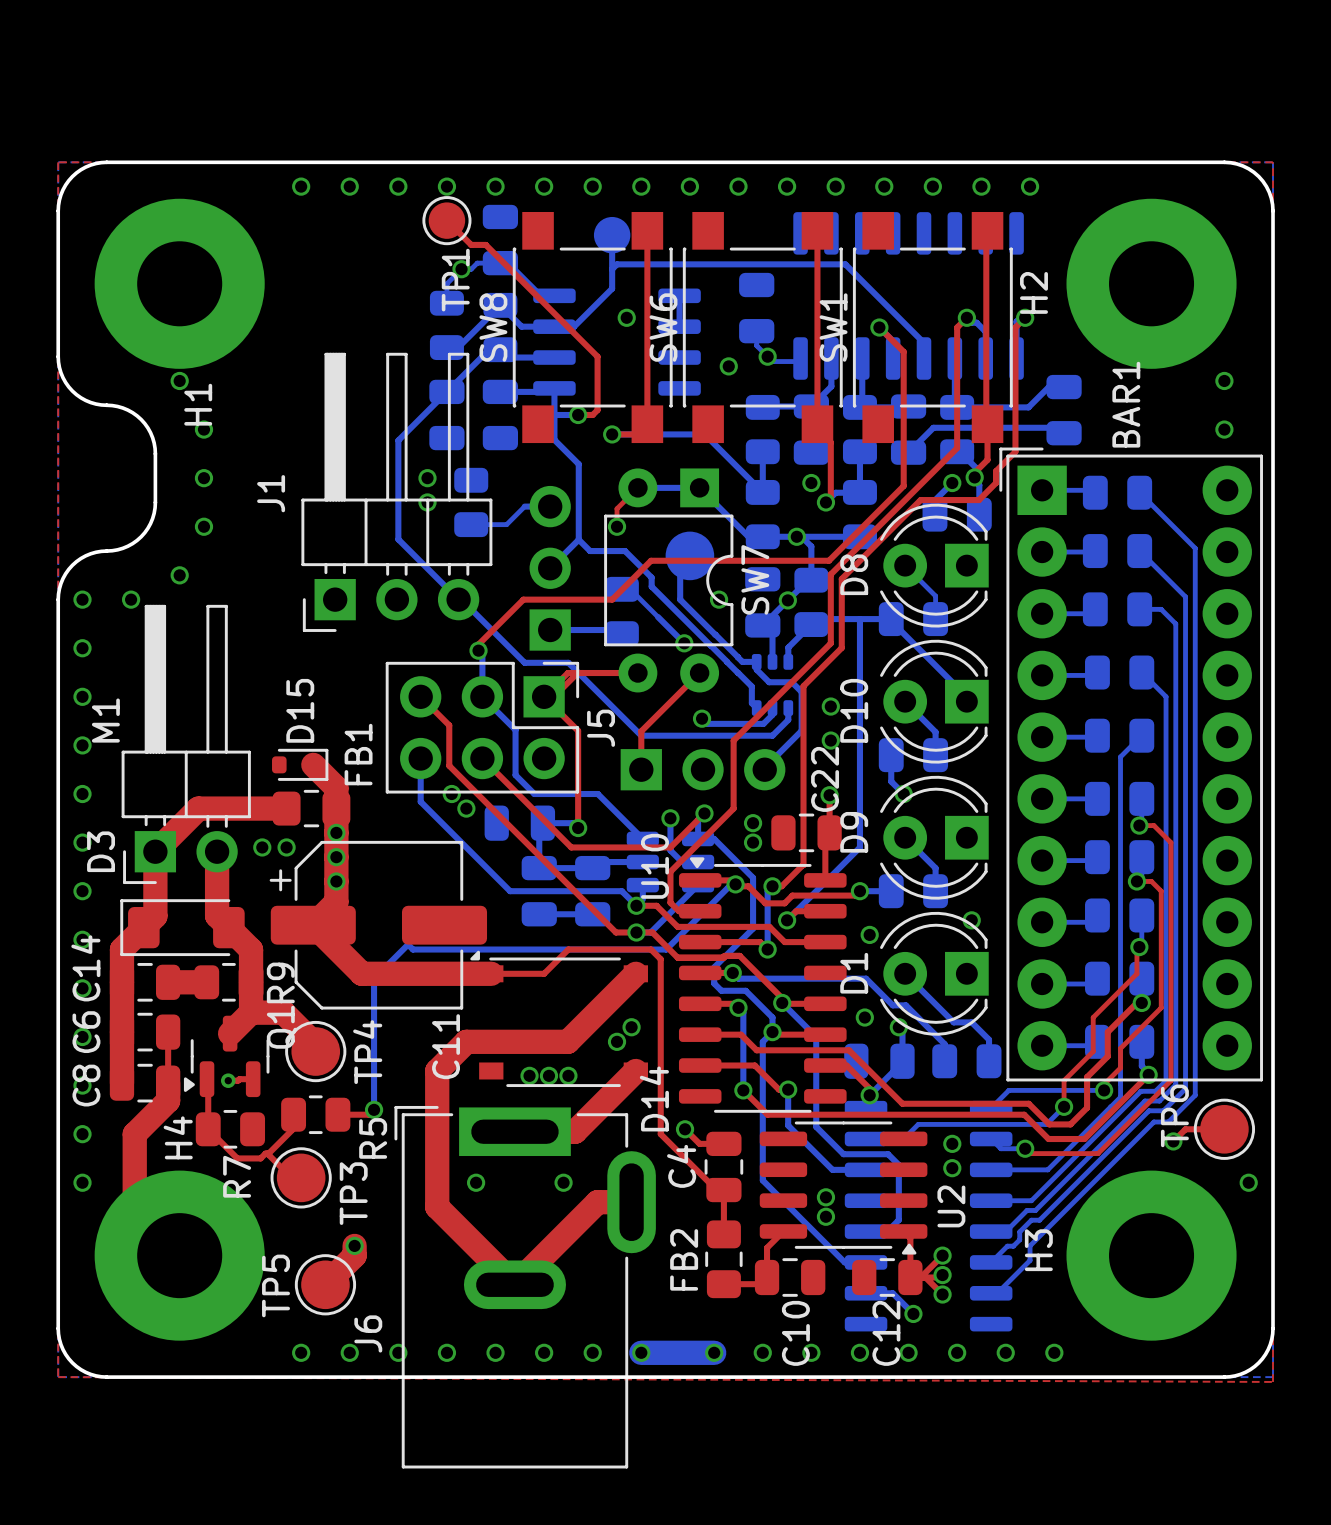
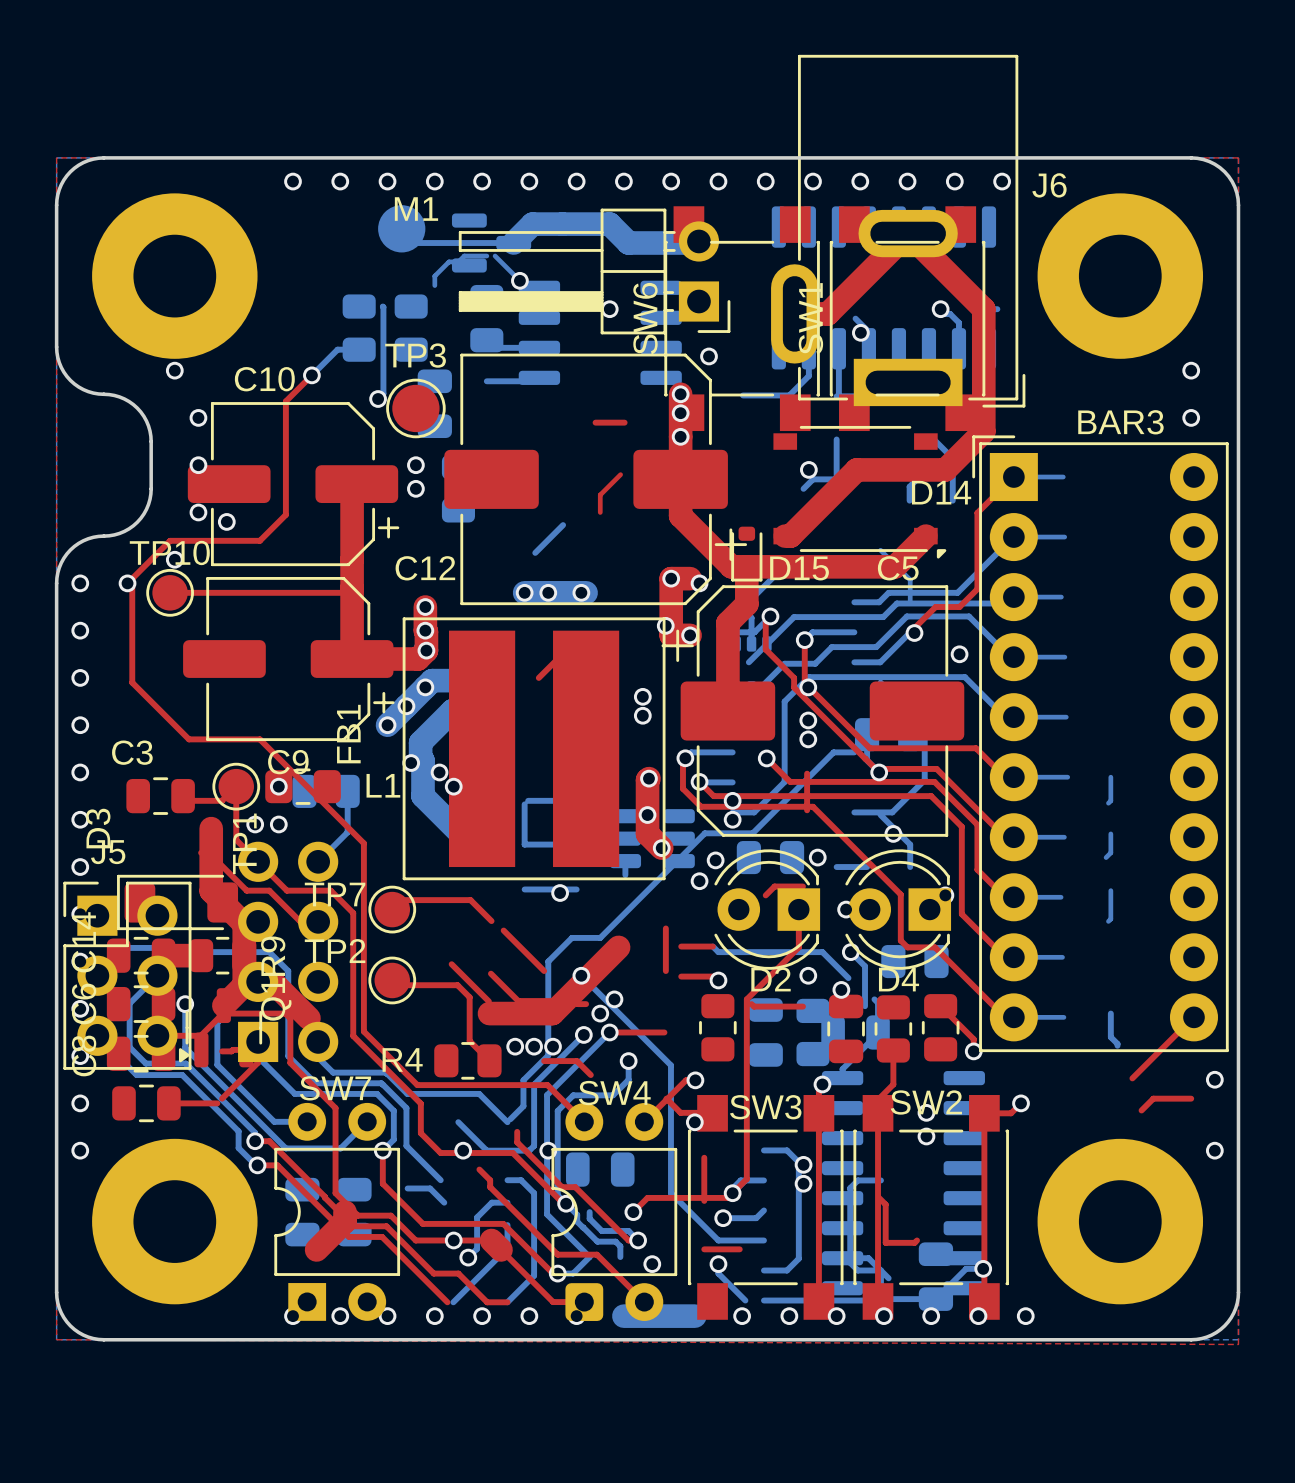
part footprint: [482, 204, 519, 276] -> [451, 213, 532, 273]
top track: (446, 220) (471, 244) (485, 244) (597, 356) (597, 410) (592, 414) (578, 414) -> none
TP1 position: (446, 220) -> (236, 786)
top track: (647, 230) (647, 424) -> none
top track: (817, 230) (817, 429) (830, 442) (830, 497) (825, 502) -> none
bottom track: (612, 235) (612, 288) (574, 326) (521, 326) (500, 305) (458, 347) -> none
part: (612, 235) -> none
top track: (986, 236) (986, 427) -> none
bottom track: none -> (415, 243) (513, 243) (532, 224) (609, 224) (628, 243) (697, 243)
via: (461, 269) -> none
bottom track: (612, 269) (617, 264) (845, 264) (923, 342) -> none
via: none -> (519, 280)
H2 name: H2 (1033, 292) -> none
bottom track: (679, 295) (679, 326) -> none
part: (756, 308) -> none
bottom track: none -> (382, 306) (383, 393) (378, 399)
top track: (966, 317) (957, 327) (957, 448) (830, 574) (830, 643) (733, 740) (733, 808) (670, 871) (670, 902) (678, 911) (700, 911) -> none
top track: (1025, 317) (1015, 327) (1015, 451) (996, 471) (996, 483) (979, 500) (920, 500) (841, 578) (841, 647) (803, 686) (803, 865) (781, 886) (772, 886) -> none
via: (1025, 317) -> none
top track: none -> (794, 313) (827, 313) (908, 233) (983, 309) (983, 431) (945, 469) (856, 469) (790, 536) (785, 536)
part position: (446, 325) -> (411, 328)
SW8: (592, 327) -> none
top track: (879, 327) (903, 351) (903, 486) (828, 560) (651, 560) (612, 599) (523, 599) (478, 644) (478, 650) -> none
via position: (879, 327) -> (860, 332)
bottom track: (756, 331) (756, 345) (772, 361) (797, 361) -> none
part: none -> (359, 328)
bottom track: (489, 349) (398, 440) (398, 539) (458, 599) -> none
via: (767, 356) -> none
bottom track: none -> (359, 349) (337, 349) (311, 375)
top track: none -> (311, 375) (285, 401) (285, 514) (259, 540) (170, 540) (132, 578) (132, 682) (188, 739) (259, 739) (363, 843) (363, 1031) (417, 1085) (547, 1085) (584, 1121)
via: none -> (311, 375)
bottom track: (1064, 387) (1048, 387) (1028, 407) (957, 407) -> none
bottom track: (554, 388) (554, 439) (578, 464) (578, 539) (590, 551) (625, 551) (651, 577) (651, 586) (710, 645) -> none
H1 name: H1 (198, 404) -> none
BAR1 name: BAR1 (1126, 404) -> BAR3 (1120, 422)
top track: none -> (680, 394) (680, 515) (731, 566) (895, 566) (925, 536)
via: none -> (680, 394)
via: none -> (378, 399)
part: (1064, 410) -> none
C3 side: bottom (500, 414) -> top (160, 796)
bottom track: (554, 414) (578, 414) -> none
via: (578, 414) -> none
via: none -> (680, 413)
top track: (987, 424) (987, 459) (974, 472) (974, 477) -> none
bottom track: (1058, 427) (933, 427) (908, 452) -> none
part: (762, 429) -> none
part: (811, 429) -> none
part: (859, 429) -> none
part: (908, 429) -> none
part: (957, 429) -> none
bottom track: (612, 434) (704, 434) (762, 492) (762, 451) -> none
via: (612, 434) -> none
via: none -> (680, 436)
via: (974, 477) -> none
via: (811, 483) -> none
via: none -> (808, 469)
via: (952, 483) -> none
bottom track: (637, 487) (699, 487) (748, 536) (859, 536) -> none
J1: (396, 492) -> none
part: (1117, 492) -> none
bottom track: (1139, 492) (1195, 548) (1195, 1095) (1168, 1122) (1153, 1122) (1030, 1245) (1030, 1260) (997, 1293) -> none
top track: none -> (1009, 481) (977, 512) (977, 589) (959, 607) (935, 607) (914, 628) (914, 633)
top track: none -> (352, 488) (352, 659) (418, 659) (426, 650) (425, 607)
via: (825, 502) -> none
bottom track: (550, 506) (524, 506) (506, 524) (471, 524) -> none
part: (762, 514) -> none
part: (859, 514) -> none
part: (957, 514) -> none
via: (617, 526) -> none
via: none -> (226, 521)
via: (796, 536) -> none
bottom track: (801, 536) (811, 546) (811, 580) -> none
part: (1117, 551) -> none
bottom track: (1139, 551) (1185, 596) (1185, 1088) (1163, 1110) (1148, 1110) (1039, 1220) (1031, 1220) (1019, 1231) (1019, 1239) (1013, 1246) (1007, 1246) (991, 1262) -> none
part position: (689, 555) -> (401, 228)
bottom track: none -> (1009, 541) (957, 592) (888, 592) (879, 602) (867, 602)
bottom track: (680, 565) (680, 599) (715, 634) -> none
D8: (934, 565) -> none
part: (550, 568) -> none
SW7 name position: SW7 (755, 579) -> SW7 (335, 1088)
SW7 rotation: 0° (668, 580) -> 180° (337, 1211)
SW7 position: (668, 580) -> (337, 1211)
top track: none -> (746, 566) (746, 604) (727, 623) (727, 711)
bottom track: (630, 589) (684, 643) -> none
via: none -> (671, 578)
top track: none -> (690, 578) (671, 578) (671, 635) (690, 635)
bottom track: (461, 599) (524, 662) (568, 662) (641, 735) (772, 735) (788, 719) (788, 708) -> none
via position: (787, 600) -> (770, 616)
part: (762, 602) -> none
part: (811, 602) -> none
top track: none -> (352, 588) (347, 592) (170, 592)
TP10: none -> (170, 592)
bottom track: none -> (524, 592) (586, 592)
via: none -> (524, 592)
via: none -> (548, 592)
via: none -> (581, 592)
part: (1117, 609) -> none
bottom track: (1139, 609) (1161, 609) (1175, 623) (1175, 1084) (1159, 1101) (1144, 1101) (1035, 1210) (1027, 1210) (1005, 1231) (991, 1231) -> none
part: (621, 611) -> none
bottom track: (821, 619) (878, 619) -> none
bottom track: (859, 619) (859, 847) (787, 920) -> none
part: (913, 619) -> none
bottom track: none -> (1006, 603) (896, 603) (883, 617) (794, 617) (748, 662)
bottom track: (891, 621) (966, 696) -> none
via: none -> (425, 607)
bottom track: (811, 624) (788, 647) (788, 661) -> none
bottom track: (550, 630) (603, 630) -> none
top track: none -> (770, 616) (765, 621) (765, 649) (794, 677) (794, 687) (865, 758)
bottom track: none -> (770, 616) (754, 632) (732, 632)
bottom track: (715, 634) (737, 657) -> none
bottom track: (710, 645) (726, 661) -> none
via: none -> (425, 630)
bottom track: none -> (854, 632) (812, 632) (804, 640)
bottom track: (478, 650) (482, 654) (482, 696) (515, 729) (515, 775) (534, 794) (597, 794) (642, 838) -> none
via: (478, 650) -> none
bottom track: none -> (914, 633) (909, 633) (880, 662) (854, 662)
via: none -> (914, 633)
via: none -> (690, 635)
bottom track: (737, 657) (742, 661) (756, 661) (756, 669) (769, 682) (791, 682) (801, 691) (801, 730) (764, 767) -> none
top track: none -> (804, 640) (804, 683) (869, 748) (976, 748) (1009, 781)
via: none -> (804, 640)
bottom track: (726, 661) (737, 672) -> none
via: none -> (426, 650)
bottom track: (738, 672) (751, 686) (751, 703) (756, 708) -> none
via: none -> (959, 654)
part: (1119, 672) -> none
bottom track: (1141, 672) (1166, 696) (1166, 1080) (1155, 1091) (1140, 1091) (1031, 1200) (991, 1200) -> none
top track: (637, 673) (567, 673) (544, 696) (578, 730) (578, 828) -> none
top track: (699, 673) (641, 731) (641, 769) -> none
bottom track: none -> (1009, 656) (969, 616) (906, 616) (876, 647) (831, 647) (815, 663) (784, 663) (756, 692) (732, 692)
C9: none -> (288, 659)
top track: (420, 696) (449, 725) (449, 765) (615, 932) (652, 932) (677, 957) (723, 957) (725, 955) -> none
bottom track: none -> (472, 680) (432, 680) (387, 725)
D10: (934, 701) -> none
via: none -> (425, 687)
bottom track: (772, 708) (772, 714) (763, 723) (707, 723) (699, 716) -> none
via: none -> (642, 696)
via: (702, 718) -> none
M1 name position: M1 (105, 720) -> M1 (416, 209)
via: none -> (406, 706)
bottom track: none -> (948, 706) (924, 730) (924, 780) (892, 812) (854, 812)
J5 rotation: 0° (482, 727) -> 90° counterclockwise (127, 975)
J5 position: (482, 727) -> (127, 975)
bottom track: none -> (472, 710) (452, 710) (420, 742) (420, 758) (423, 760) (423, 796) (458, 831)
C5: none -> (812, 711)
via: none -> (642, 715)
part: (1119, 735) -> none
bottom track: (1141, 735) (1120, 756) (1120, 1097) (1047, 1169) (991, 1169) -> none
bottom track: none -> (1009, 721) (964, 677) (809, 677) (784, 701) (784, 781) (754, 812) (732, 812)
M1 rotation: 0° (186, 744) -> 90° counterclockwise (594, 271)
M1 position: (186, 744) -> (594, 271)
via: none -> (387, 725)
bottom track: (420, 758) (420, 801) (510, 891) (621, 891) (636, 905) -> none
top track: (482, 758) (571, 847) (670, 847) (704, 813) -> none
via: none -> (808, 739)
D15 rotation: 0° (300, 764) -> 90° clockwise (746, 554)
D15 position: (300, 764) -> (746, 554)
top track: (313, 764) (336, 787) (336, 902) (313, 925) (361, 973) (544, 973) (568, 949) (651, 949) (660, 959) (660, 1134) (716, 1190) -> none
L1: none -> (534, 748)
part: (703, 769) -> none
bottom track: none -> (732, 752) (691, 752) (685, 758)
bottom track: none -> (854, 752) (833, 752) (752, 833) (704, 833) (600, 937) (571, 937) (548, 961) (548, 1055) (523, 1080) (523, 1106) (510, 1119)
top track: none -> (685, 758) (682, 760) (682, 788) (700, 806) (813, 806) (900, 894) (900, 940) (907, 947) (934, 947) (1009, 1021)
via: none -> (685, 758)
top track: none -> (766, 758) (790, 781) (934, 781) (977, 824) (977, 869) (1009, 901)
via: none -> (766, 758)
top track: none -> (865, 758) (875, 768) (936, 768) (1009, 841)
via: none -> (411, 763)
via: (829, 795) -> none
part: (1119, 798) -> none
top track: none -> (648, 778) (647, 833) (661, 848)
top track: none -> (699, 781) (713, 796) (931, 796) (961, 826) (961, 914) (1009, 961)
bottom track: none -> (699, 781) (732, 782)
top track: (286, 808) (198, 808) (155, 851) (155, 916) (121, 949) (121, 1083) -> none
via: none -> (278, 786)
part: none -> (326, 791)
bottom track: none -> (347, 791) (347, 832) (318, 861)
bottom track: (704, 813) (698, 819) (698, 838) (714, 838) (753, 877) (753, 928) (714, 967) (714, 983) (721, 990) (745, 990) (772, 1017) (772, 1032) (762, 1041) (762, 1180) (844, 1262) (866, 1262) -> none
via position: (704, 813) -> (699, 781)
top track: none -> (187, 796) (192, 800) (222, 800) (236, 786) (236, 839) (286, 890) (330, 890) (353, 913) (353, 1036) (420, 1103) (420, 1133) (440, 1153) (512, 1153) (559, 1200) (566, 1203)
bottom track: (670, 818) (670, 850) (682, 862) (698, 862) -> none
via position: (670, 818) -> (648, 778)
part: (519, 823) -> none
top track: (1139, 825) (1153, 825) (1170, 842) (1170, 1080) (1098, 1153) (1030, 1153) (1025, 1148) -> none
via: (1139, 825) -> none
via: (578, 828) -> none
via: (336, 832) -> none
C22: (806, 832) -> none
via: none -> (647, 815)
top track: (825, 837) (825, 880) -> (665, 928) (665, 971)
D9: (934, 837) -> none
via: (336, 857) -> none
via: none -> (893, 833)
part: (1119, 857) -> none
via: none -> (661, 848)
top track: none -> (201, 852) (208, 852) (246, 890) (269, 890) (300, 921) (318, 921)
top track: (700, 880) (731, 880) (738, 886) (748, 886) (765, 903) (784, 903) (792, 895) (855, 895) (859, 891) -> none
via: (336, 881) -> none
part: none -> (770, 857)
top track: (1136, 881) (1151, 881) (1161, 891) (1161, 1007) (1120, 1048) (1120, 1067) (1104, 1084) (1104, 1090) -> none
via: (1136, 881) -> none
bottom track: (735, 884) (732, 886) (728, 886) (666, 949) (412, 949) (408, 944) (374, 978) (374, 1109) -> none
bottom track: (698, 885) (650, 932) (636, 932) -> none
bottom track: (772, 886) (767, 891) (767, 949) -> none
via: (772, 886) -> none
part: (539, 891) -> none
part: (592, 891) -> none
via position: (859, 891) -> (817, 857)
part: (913, 891) -> none
top track: (636, 905) (656, 905) (677, 926) (769, 926) (784, 942) (825, 942) -> none
via: (636, 905) -> none
via: none -> (699, 881)
part: (1119, 915) -> none
via: none -> (560, 893)
via: (787, 920) -> none
C11: (378, 925) -> none
top track: none -> (401, 900) (470, 900) (491, 921)
via: (636, 932) -> none
TP7: none -> (392, 909)
D2: none -> (767, 909)
top track: none -> (798, 909) (798, 947) (746, 999) (746, 1179) (727, 1197) (647, 1197) (633, 1212)
D4: none -> (898, 909)
top track: (700, 942) (760, 942) (767, 949) -> none
top track: (1139, 947) (1136, 949) (1136, 973) (1093, 1017) (1093, 1051) (1064, 1080) (1064, 1106) -> none
via: (1139, 947) -> none
via: (767, 949) -> none
top track: none -> (503, 930) (544, 971)
top track: (722, 957) (724, 955) (739, 955) (782, 998) (783, 1003) (825, 1003) -> none
via: (732, 972) -> none
bottom track: (905, 973) (953, 1022) (971, 1022) (989, 1039) (989, 1061) -> none
D1: (934, 973) -> none
part: none -> (288, 951)
bottom track: (845, 978) (866, 978) (892, 1005) (905, 1005) (944, 1044) (944, 1061) -> (822, 952) (848, 978)
bottom track: none -> (850, 952) (865, 966) (865, 1006)
via: none -> (850, 952)
part: (1119, 978) -> none
U10: (762, 985) -> none
part: none -> (914, 961)
top track: none -> (451, 964) (488, 1001)
top track: none -> (490, 973) (518, 1001) (574, 1001) (578, 1004) (586, 1004)
bottom track: none -> (97, 975) (125, 947) (168, 947) (173, 952) (269, 952) (288, 971) (288, 1056) (315, 1083) (381, 1083) (406, 1108) (406, 1145) (440, 1180)
bottom track: none -> (157, 975) (129, 1003) (129, 1047) (145, 1063) (185, 1063) (255, 1132) (255, 1141)
bottom track: none -> (581, 975) (670, 1065) (670, 1193) (718, 1240) (763, 1240)
via: none -> (581, 975)
bottom track: (782, 1002) (816, 1036) (816, 1126) (843, 1154) (888, 1154) (898, 1164) (898, 1220) (887, 1231) (866, 1231) -> none
via: (782, 1002) -> none
via: none -> (808, 975)
top track: (1141, 1002) (1136, 1002) (1107, 1032) (1107, 1056) (1087, 1077) (1087, 1107) (1070, 1124) (1049, 1124) (1028, 1103) (902, 1103) (849, 1050) (756, 1050) (741, 1034) (700, 1034) -> none
via: (1141, 1002) -> none
TP2: none -> (392, 980)
bottom track: (738, 1007) (743, 1012) (743, 1090) -> none
bottom track: none -> (258, 981) (217, 1022) (217, 1064) (274, 1121) (307, 1121)
top track: none -> (404, 985) (457, 985) (469, 997) (469, 1041) (489, 1060)
D14 rotation: 0° (559, 1018) -> 180° (859, 492)
D14 position: (559, 1018) -> (859, 492)
via: (898, 1027) -> none
top track: (168, 1032) (168, 1100) (134, 1134) (134, 1210) (179, 1255) -> none
bottom track: none -> (185, 1004) (185, 1047) (285, 1148) (340, 1148) (367, 1121)
via: none -> (185, 1004)
via: (772, 1032) -> none
top track: none -> (940, 1006) (973, 1039) (973, 1051)
top track: (503, 1041) (466, 1041) (437, 1070) (437, 1207) (505, 1275) -> (157, 1035) (200, 1035) (222, 1013) (285, 1013) (290, 1018) (290, 1062) (335, 1108) (335, 1193) (357, 1215) (390, 1215) (415, 1240) (491, 1240)
part: (1119, 1041) -> none
top track: none -> (1189, 1021) (1132, 1078)
TP4: (315, 1051) -> none
part: none -> (717, 1027)
part: none -> (846, 1028)
part: none -> (893, 1028)
bottom track: none -> (609, 1032) (547, 1095) (547, 1214) (589, 1257) (573, 1273) (557, 1273)
via: none -> (609, 1032)
top track: none -> (633, 1032) (609, 1032) (664, 1032)
part: none -> (765, 1032)
part: none -> (813, 1032)
part side: bottom (966, 1061) -> top (940, 1027)
bottom track: none -> (583, 1034) (534, 1084) (534, 1145) (529, 1150) (486, 1150) (458, 1122)
via: none -> (583, 1034)
bottom track: none -> (97, 1035) (136, 1075) (182, 1075) (238, 1131) (238, 1148) (257, 1165)
top track: (700, 1065) (754, 1065) (778, 1089) (788, 1089) -> none
top track: (825, 1065) (846, 1065) (869, 1088) (869, 1095) -> none
top track: none -> (258, 1041) (258, 1062) (222, 1098)
top track: (635, 1070) (575, 1131) (514, 1131) -> none
top track: (1148, 1074) (1084, 1139) (1048, 1139) (1024, 1114) (767, 1114) (743, 1090) -> none
via: (1148, 1074) -> none
top track: none -> (893, 1050) (893, 1084) (878, 1099)
top track: (208, 1080) (208, 1129) (237, 1158) (260, 1158) (267, 1153) (291, 1177) -> none
via: (228, 1080) -> none
via: none -> (973, 1051)
bottom track: none -> (258, 1057) (294, 1093) (376, 1093) (393, 1110) (393, 1139) (382, 1150)
bottom track: none -> (318, 1057) (333, 1072) (387, 1073)
bottom track: (788, 1089) (788, 1125) (832, 1169) (866, 1169) -> none
via: (788, 1089) -> none
R4: none -> (467, 1060)
top track: none -> (544, 1061) (576, 1061) (590, 1075)
bottom track: none -> (628, 1061) (628, 1079) (613, 1095) (573, 1095) (557, 1110) (557, 1195) (577, 1214) (577, 1221) (597, 1241) (615, 1241) (620, 1246) (620, 1257)
via: none -> (628, 1061)
via: (743, 1090) -> none
bottom track: (1104, 1090) (1008, 1090) (994, 1104) -> none
via: (1104, 1090) -> none
via: (869, 1095) -> none
D14 name position: D14 (654, 1098) -> D14 (941, 492)
bottom track: none -> (387, 1073) (407, 1093) (479, 1093) (507, 1122)
bottom track: (1064, 1106) (1046, 1124) (918, 1124) (903, 1139) (866, 1139) -> none
via: (1064, 1106) -> none
top track: (374, 1109) (369, 1114) (337, 1114) -> none
via: (374, 1109) -> none
via: none -> (1214, 1079)
top track: none -> (695, 1080) (685, 1080) (644, 1121)
via: none -> (695, 1080)
top track: (292, 1112) (292, 1129) (268, 1154) -> none
R5: (315, 1114) -> none
top track: none -> (822, 1084) (818, 1088) (818, 1301)
via: none -> (822, 1084)
R7: (230, 1129) -> none
via: (685, 1129) -> none
TP6: (1224, 1129) -> none
part: none -> (146, 1103)
top track: none -> (168, 1103) (217, 1103)
top track: none -> (1021, 1103) (1011, 1113) (984, 1113) (984, 1301)
via: none -> (1021, 1103)
H4 name: H4 (178, 1137) -> none
bottom track: (991, 1139) (1000, 1148) (1025, 1148) -> none
via: (1173, 1141) -> none
top track: none -> (878, 1113) (878, 1301)
via: (1025, 1148) -> none
via: none -> (694, 1122)
top track: none -> (517, 1131) (517, 1142) (562, 1187) (575, 1187) (628, 1240) (638, 1240)
C4: (723, 1166) -> none
top track: none -> (255, 1141) (269, 1141) (353, 1226) (386, 1226) (433, 1273) (458, 1273) (487, 1302) (507, 1302)
via: none -> (255, 1141)
TP3 position: (301, 1177) -> (415, 408)
top track: none -> (382, 1150) (382, 1183) (422, 1223) (503, 1223) (553, 1273) (557, 1273)
via: none -> (382, 1150)
bottom track: none -> (763, 1150) (787, 1150) (798, 1162) (798, 1258) (787, 1270) (763, 1270)
U2: (843, 1188) -> none
TP3 name rotation: 0° (353, 1193) -> 90° clockwise (415, 355)
TP3 name position: TP3 (353, 1193) -> TP3 (415, 355)
top track: none -> (257, 1165) (277, 1165) (349, 1236) (382, 1236) (447, 1302)
via: none -> (257, 1165)
top track: none -> (479, 1169) (490, 1180) (490, 1187) (557, 1254) (596, 1254) (644, 1302)
part: none -> (600, 1169)
top track: (631, 1202) (597, 1202) (514, 1284) -> (584, 1302) (553, 1302) (501, 1249)
bottom track: none -> (507, 1180) (521, 1180) (534, 1193) (534, 1275) (507, 1302)
bottom track: none -> (763, 1180) (740, 1180) (727, 1193)
bottom track: none -> (880, 1180) (857, 1180) (850, 1188) (850, 1262) (857, 1270) (880, 1270) (880, 1300) (763, 1300)
bottom track: none -> (407, 1188) (430, 1188) (444, 1202)
via: none -> (732, 1193)
top track: (783, 1231) (767, 1247) (767, 1277) -> none
bottom track: none -> (507, 1202) (491, 1202) (477, 1217) (477, 1248) (468, 1257) (464, 1257)
via: none -> (566, 1203)
SW3: none -> (765, 1207)
SW2: none -> (931, 1207)
bottom track: none -> (763, 1210) (756, 1218) (723, 1218)
part: none -> (302, 1212)
via: (354, 1245) -> none
part: none -> (354, 1212)
bottom track: none -> (589, 1212) (589, 1218) (601, 1230) (628, 1230) (638, 1240)
SW4: none -> (614, 1212)
via: none -> (633, 1212)
H3 name: H3 (1038, 1250) -> none
via: none -> (723, 1218)
top track: (942, 1255) (920, 1277) -> none
via: (942, 1255) -> none
C10 footprint: [754, 1258, 826, 1297] -> [187, 402, 400, 567]
C12 footprint: [852, 1258, 923, 1297] -> [444, 353, 748, 606]
bottom track: none -> (507, 1225) (507, 1248) (453, 1302)
FB2: (723, 1259) -> none
via: none -> (453, 1240)
via: none -> (638, 1240)
via: (942, 1275) -> none
top track: (925, 1277) (942, 1294) -> none
TP5: (325, 1284) -> none
J6 rotation: 0° (525, 1287) -> 180° (898, 231)
J6 position: (525, 1287) -> (898, 231)
via: none -> (468, 1257)
via: (942, 1294) -> none
via: none -> (652, 1264)
bottom track: none -> (718, 1264) (718, 1273) (745, 1300)
via: none -> (718, 1264)
bottom track: none -> (983, 1268) (966, 1268) (935, 1299) (882, 1299)
via: none -> (983, 1268)
via: none -> (557, 1273)
part: none -> (935, 1276)
via: (913, 1313) -> none
C10 name position: C10 (795, 1333) -> C10 (264, 379)
C12 name position: C12 (886, 1333) -> C12 (425, 568)
via: (641, 1352) -> none
via: (714, 1352) -> none

